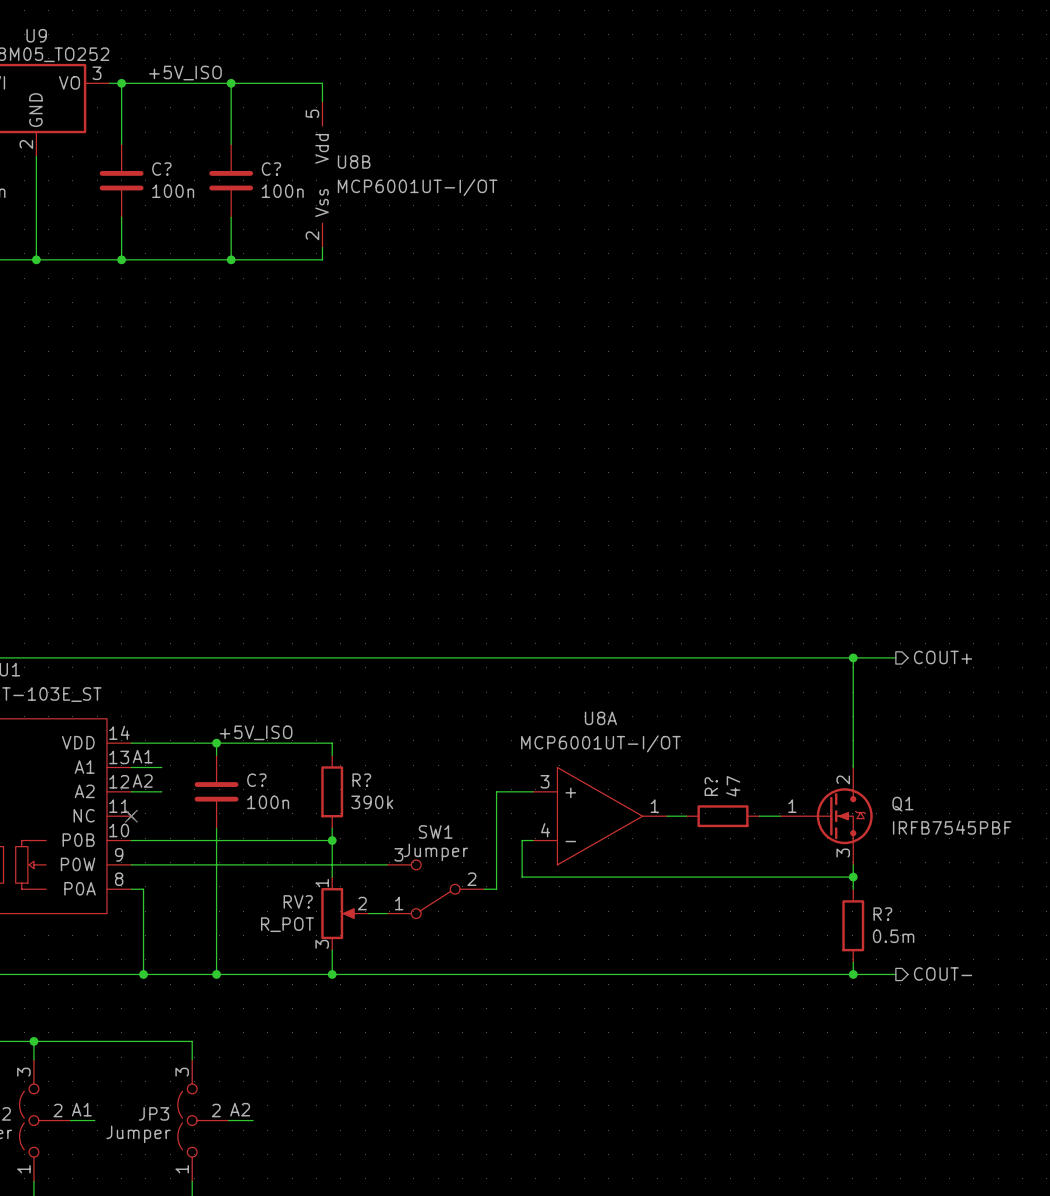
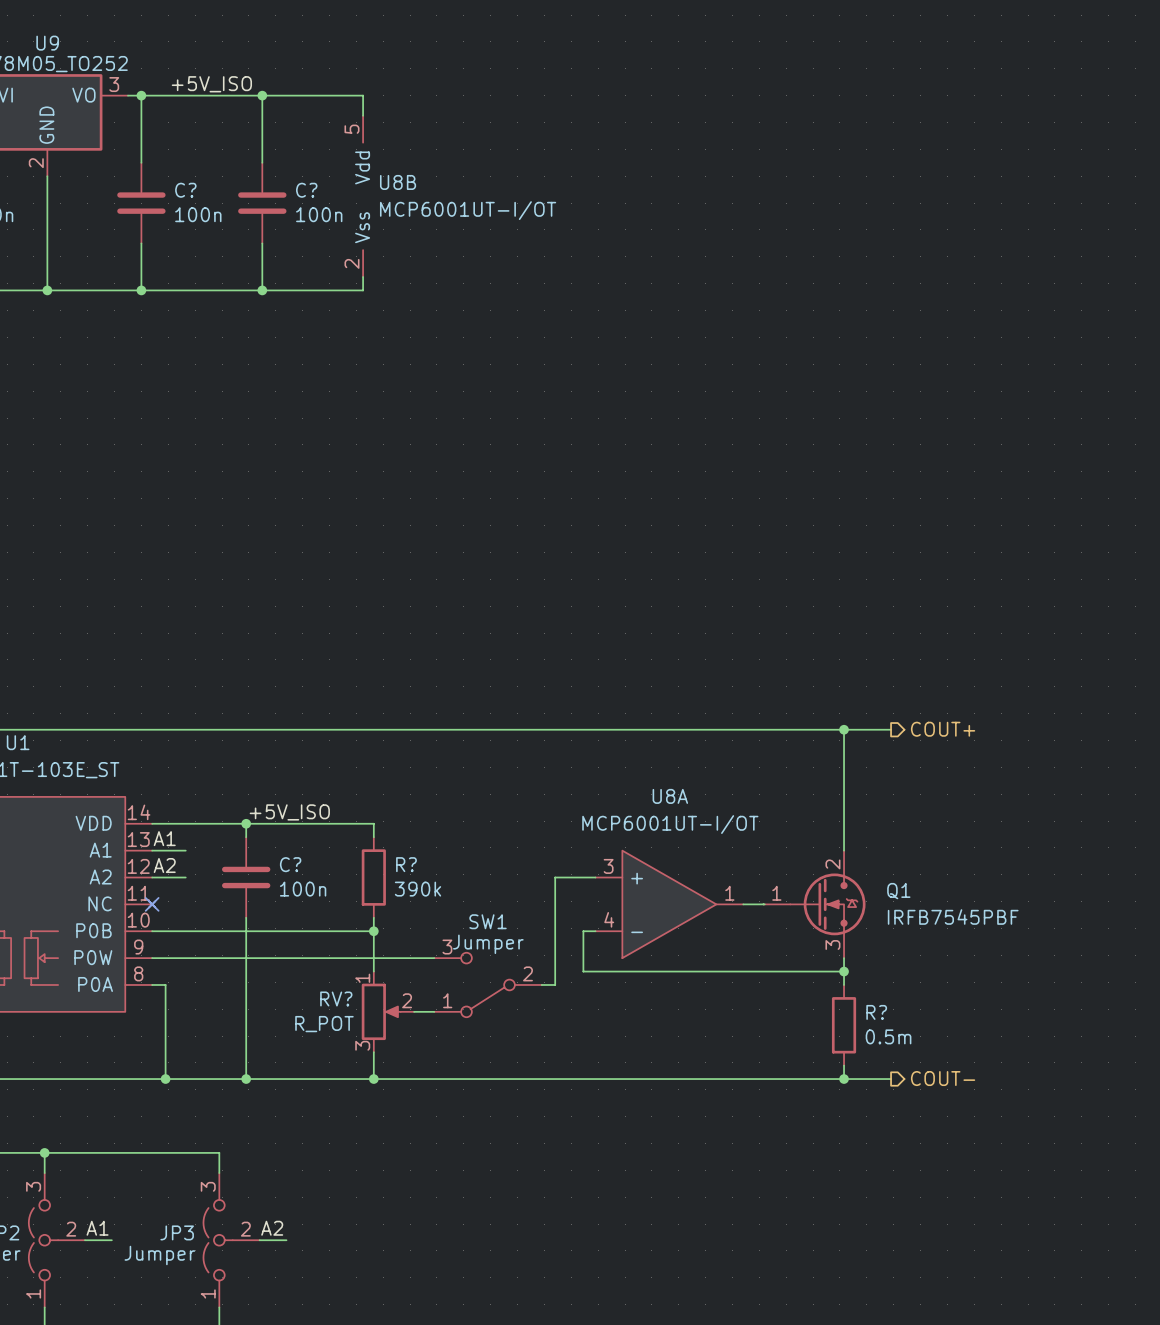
junction: none -> (844, 729)
wire: (800, 657) (895, 657) -> none
wire: (853, 657) (853, 767) -> (844, 729) (844, 850)
junction: (853, 657) -> none
hierarchical label position: COUT+ (943, 657) -> COUT+ (943, 729)
R?: 47 (723, 816) -> none
wire: (759, 816) (780, 816) -> none
Q1 position: (826, 816) -> (814, 904)
wire: (853, 864) (853, 889) -> (844, 958) (844, 984)
wire: (758, 877) (853, 877) -> none
junction: none -> (844, 971)
junction: (853, 877) -> none
R? position: (853, 925) -> (844, 1025)
wire: (853, 962) (853, 974) -> (844, 1065) (844, 1079)
junction: none -> (844, 1079)
wire: (800, 974) (895, 974) -> none
junction: (853, 974) -> none
hierarchical label position: COUT- (943, 974) -> COUT- (943, 1078)

